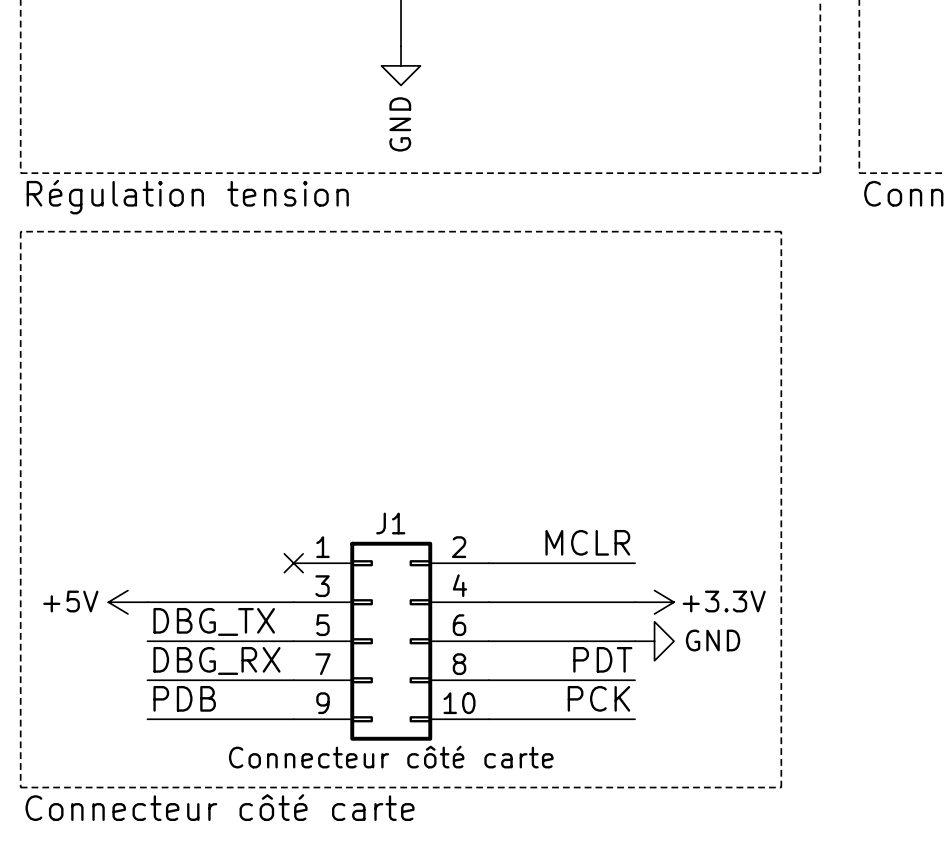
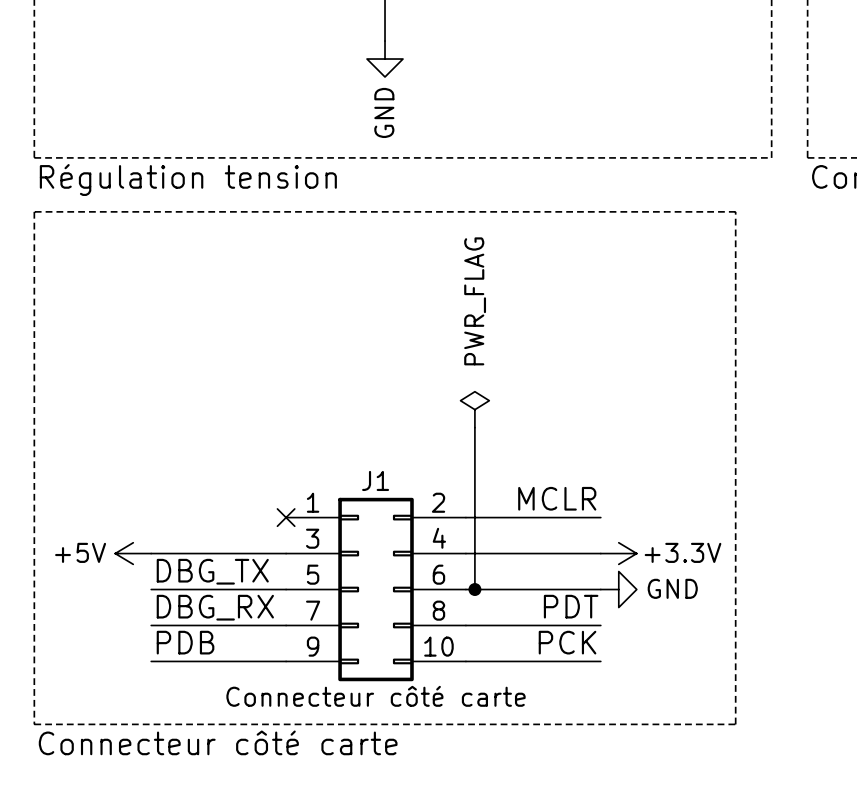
power symbol: none -> PWR_FLAG (474, 409)
wire: none -> (474, 427) (474, 589)
junction: none -> (474, 589)

